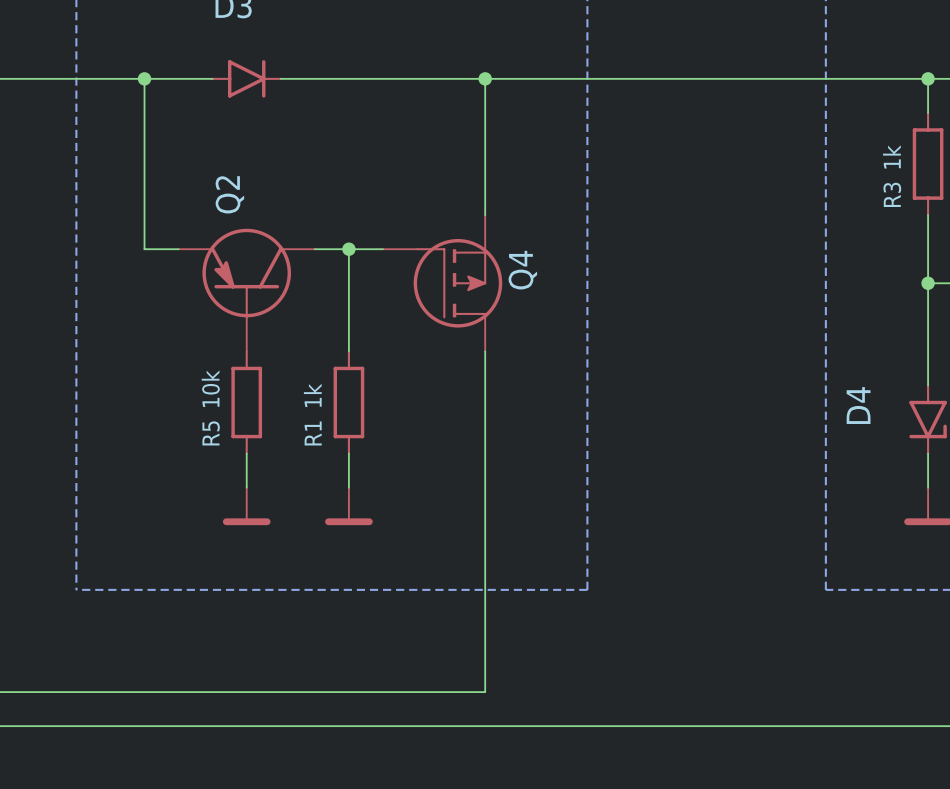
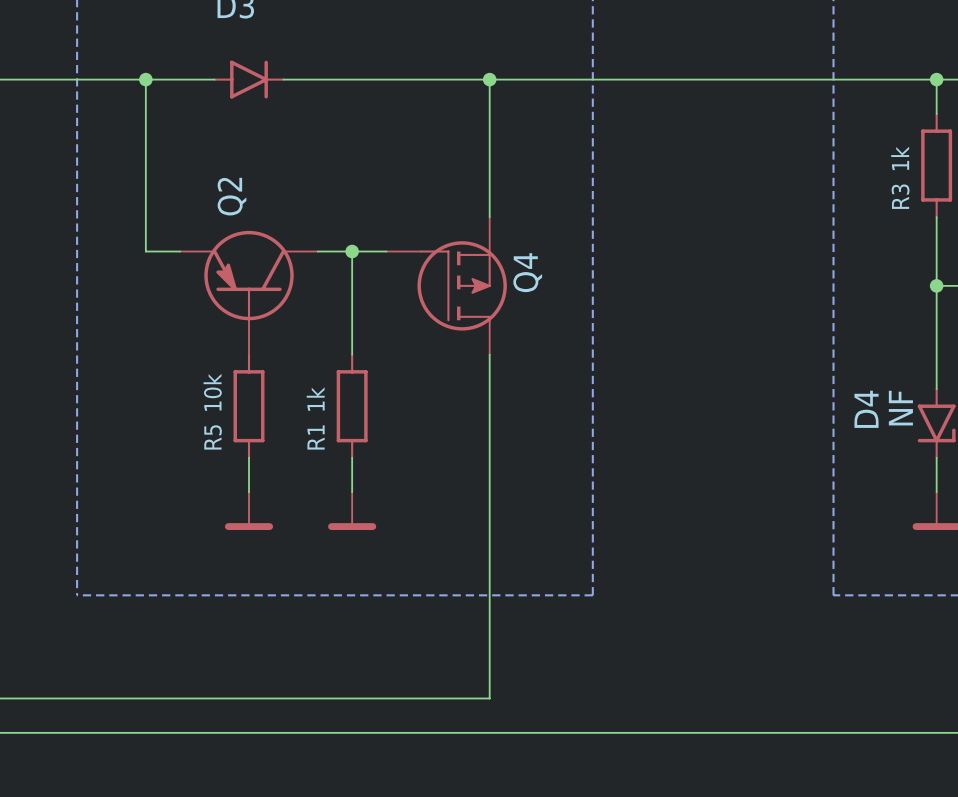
D4 value: none -> NF (900, 408)

